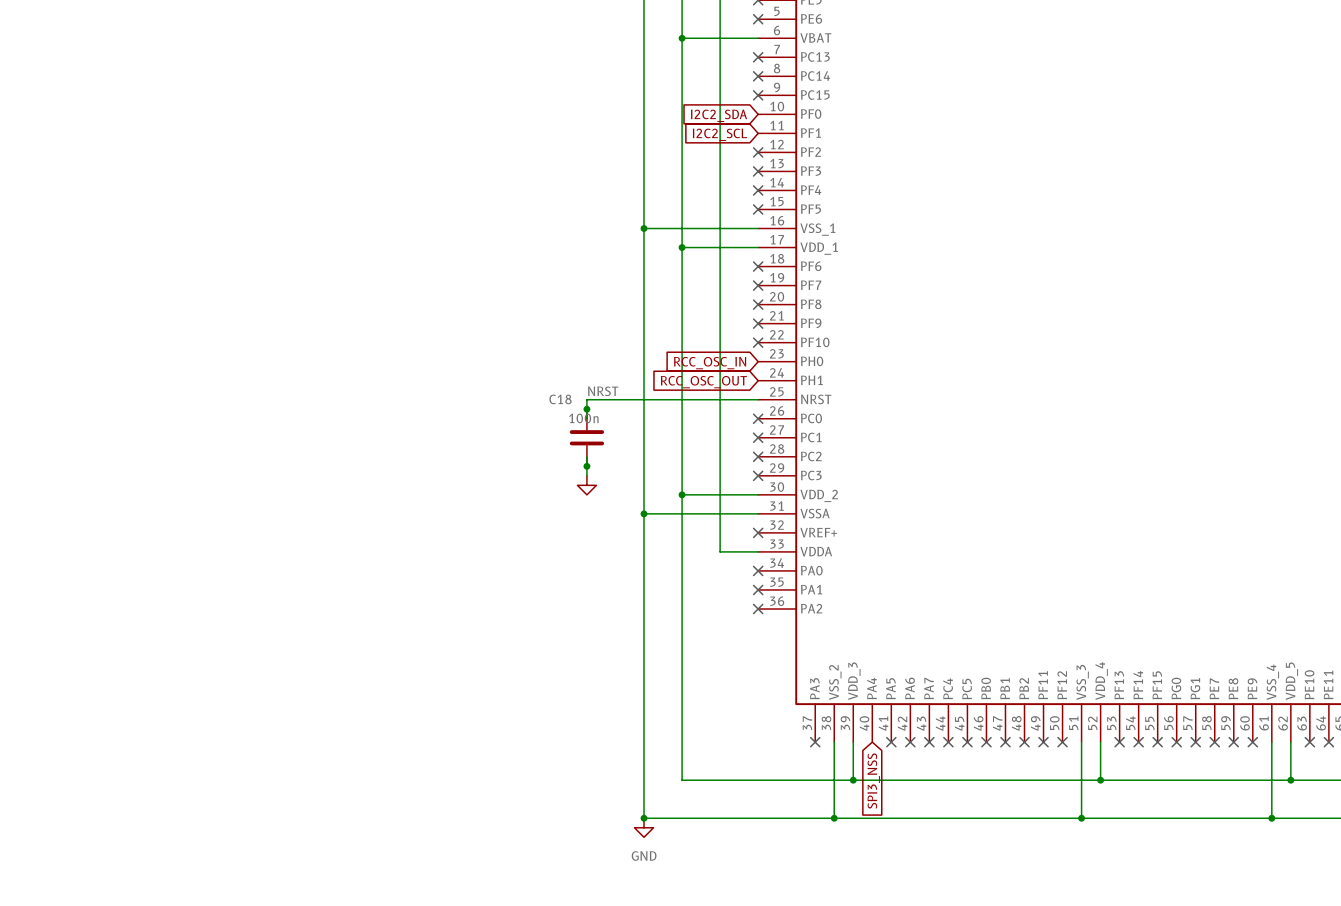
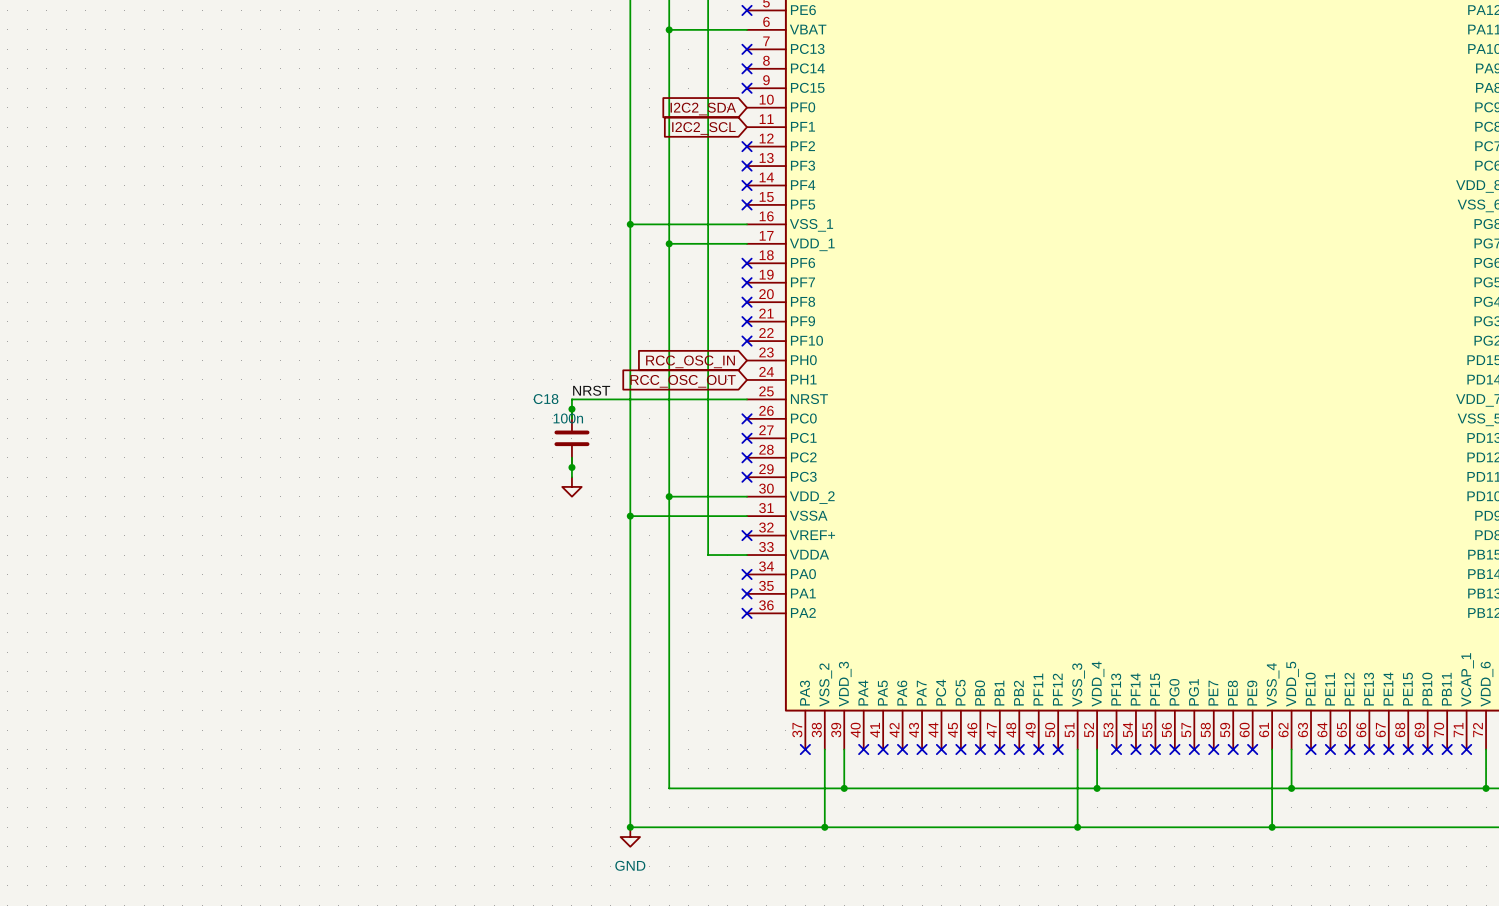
no-connect mark: none -> (863, 749)
global label: SPI3_NSS (873, 781) -> none

